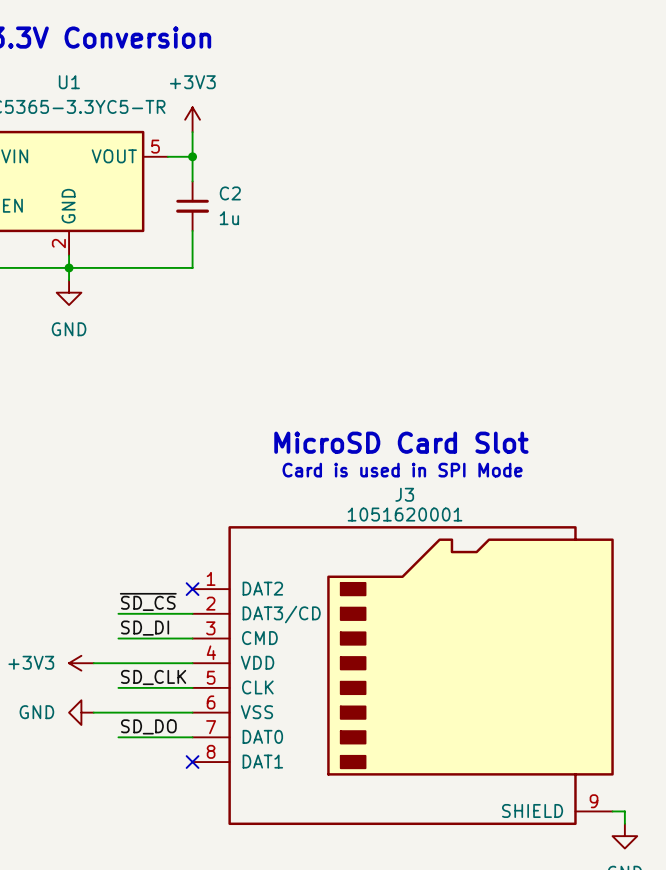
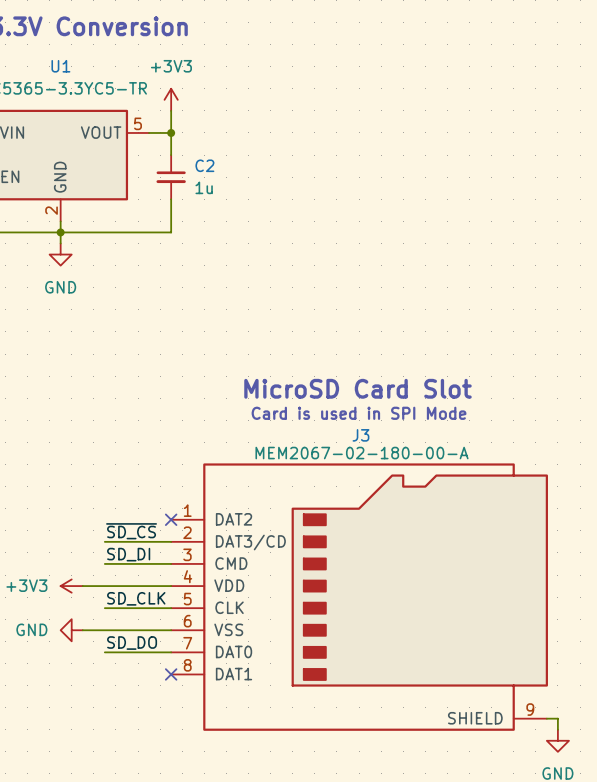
J3 value: 1051620001 (405, 514) -> MEM2067-02-180-00-A (362, 453)

